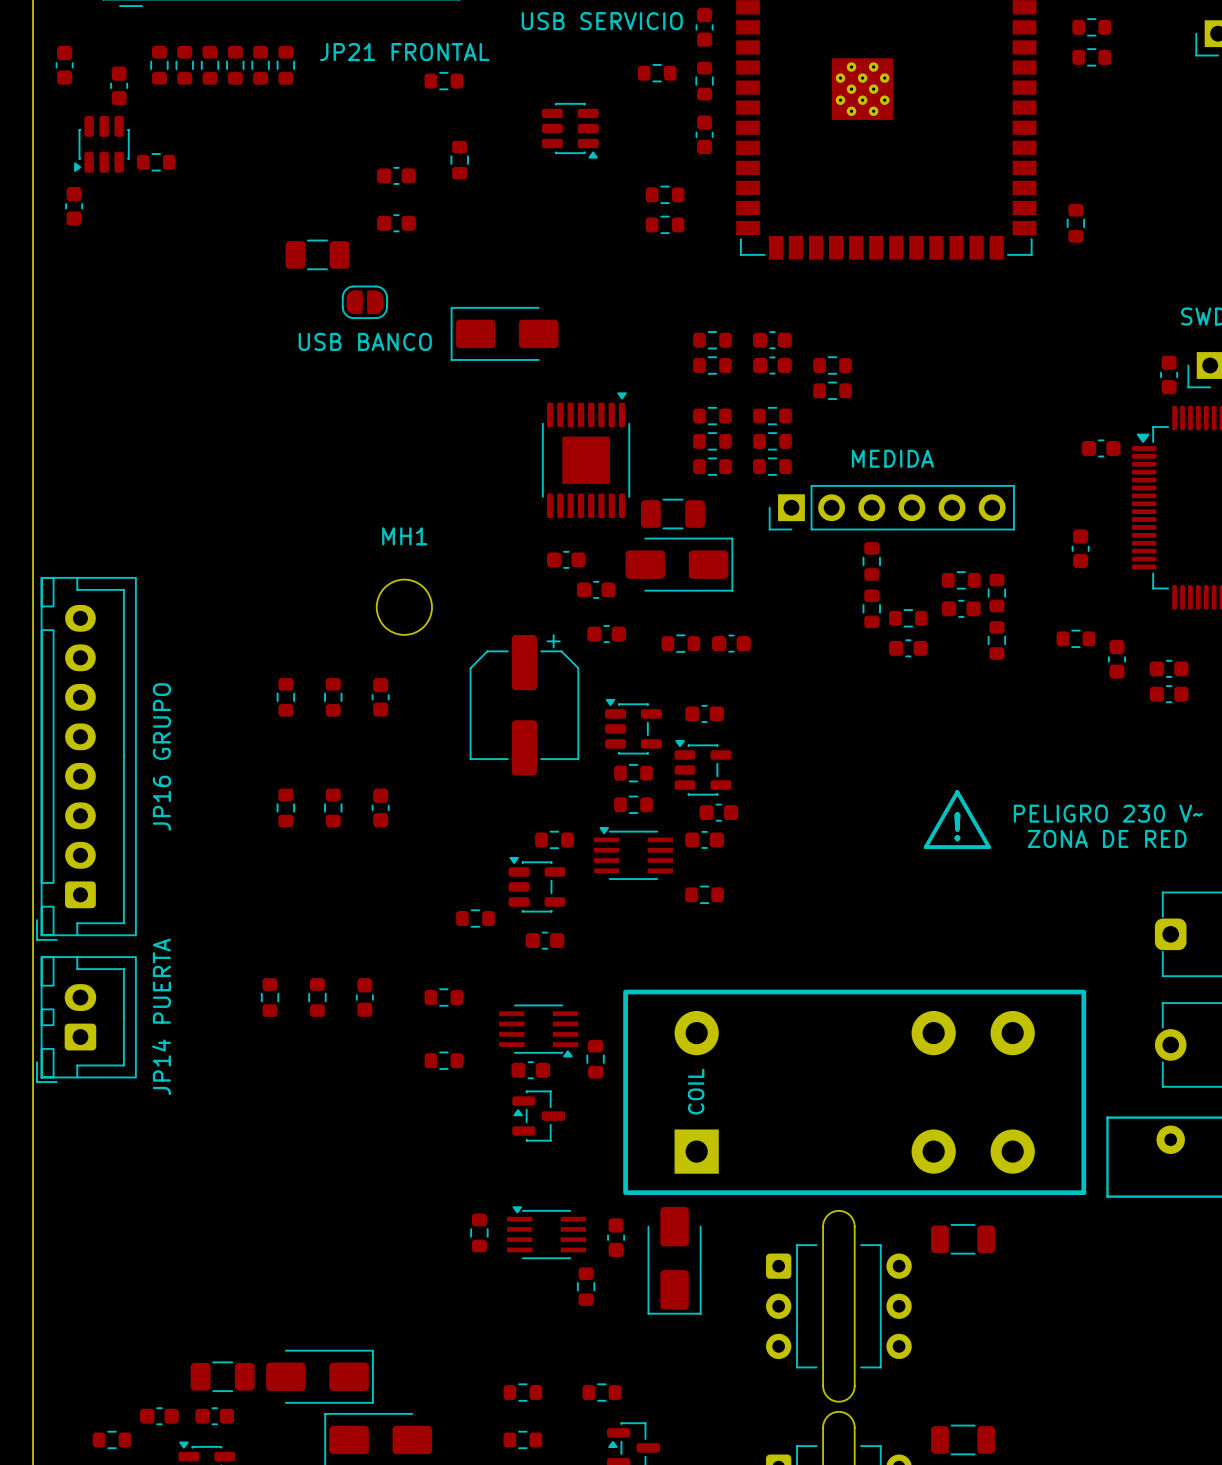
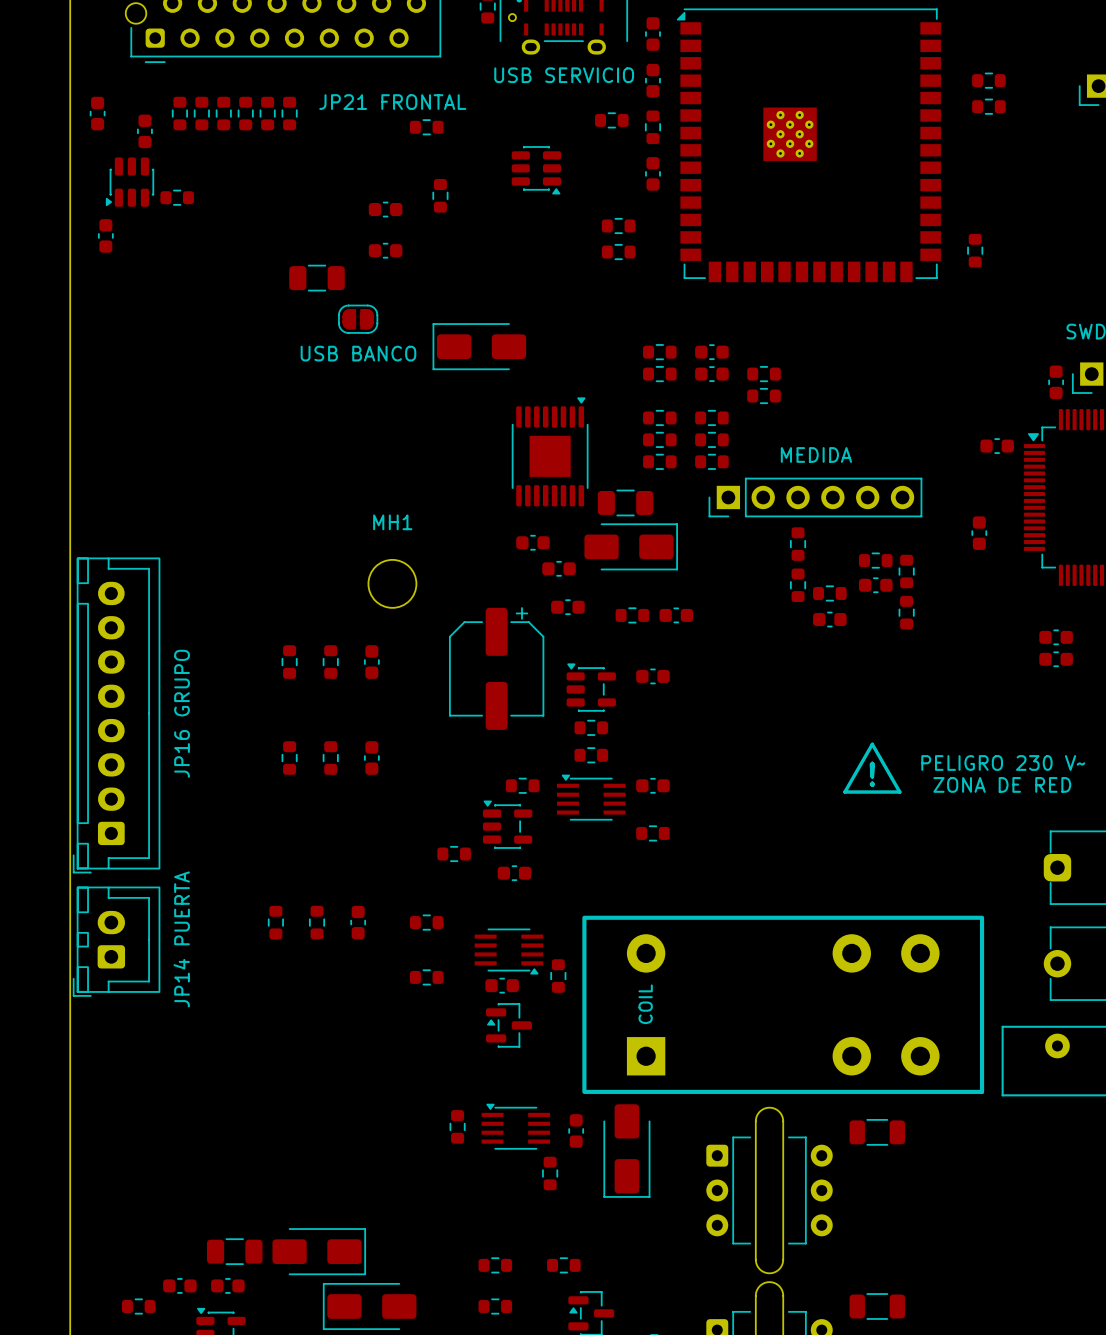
part: (1075, 638) -> none
part: (1116, 659) -> none
part: (702, 767) -> none
part: (718, 812) -> none

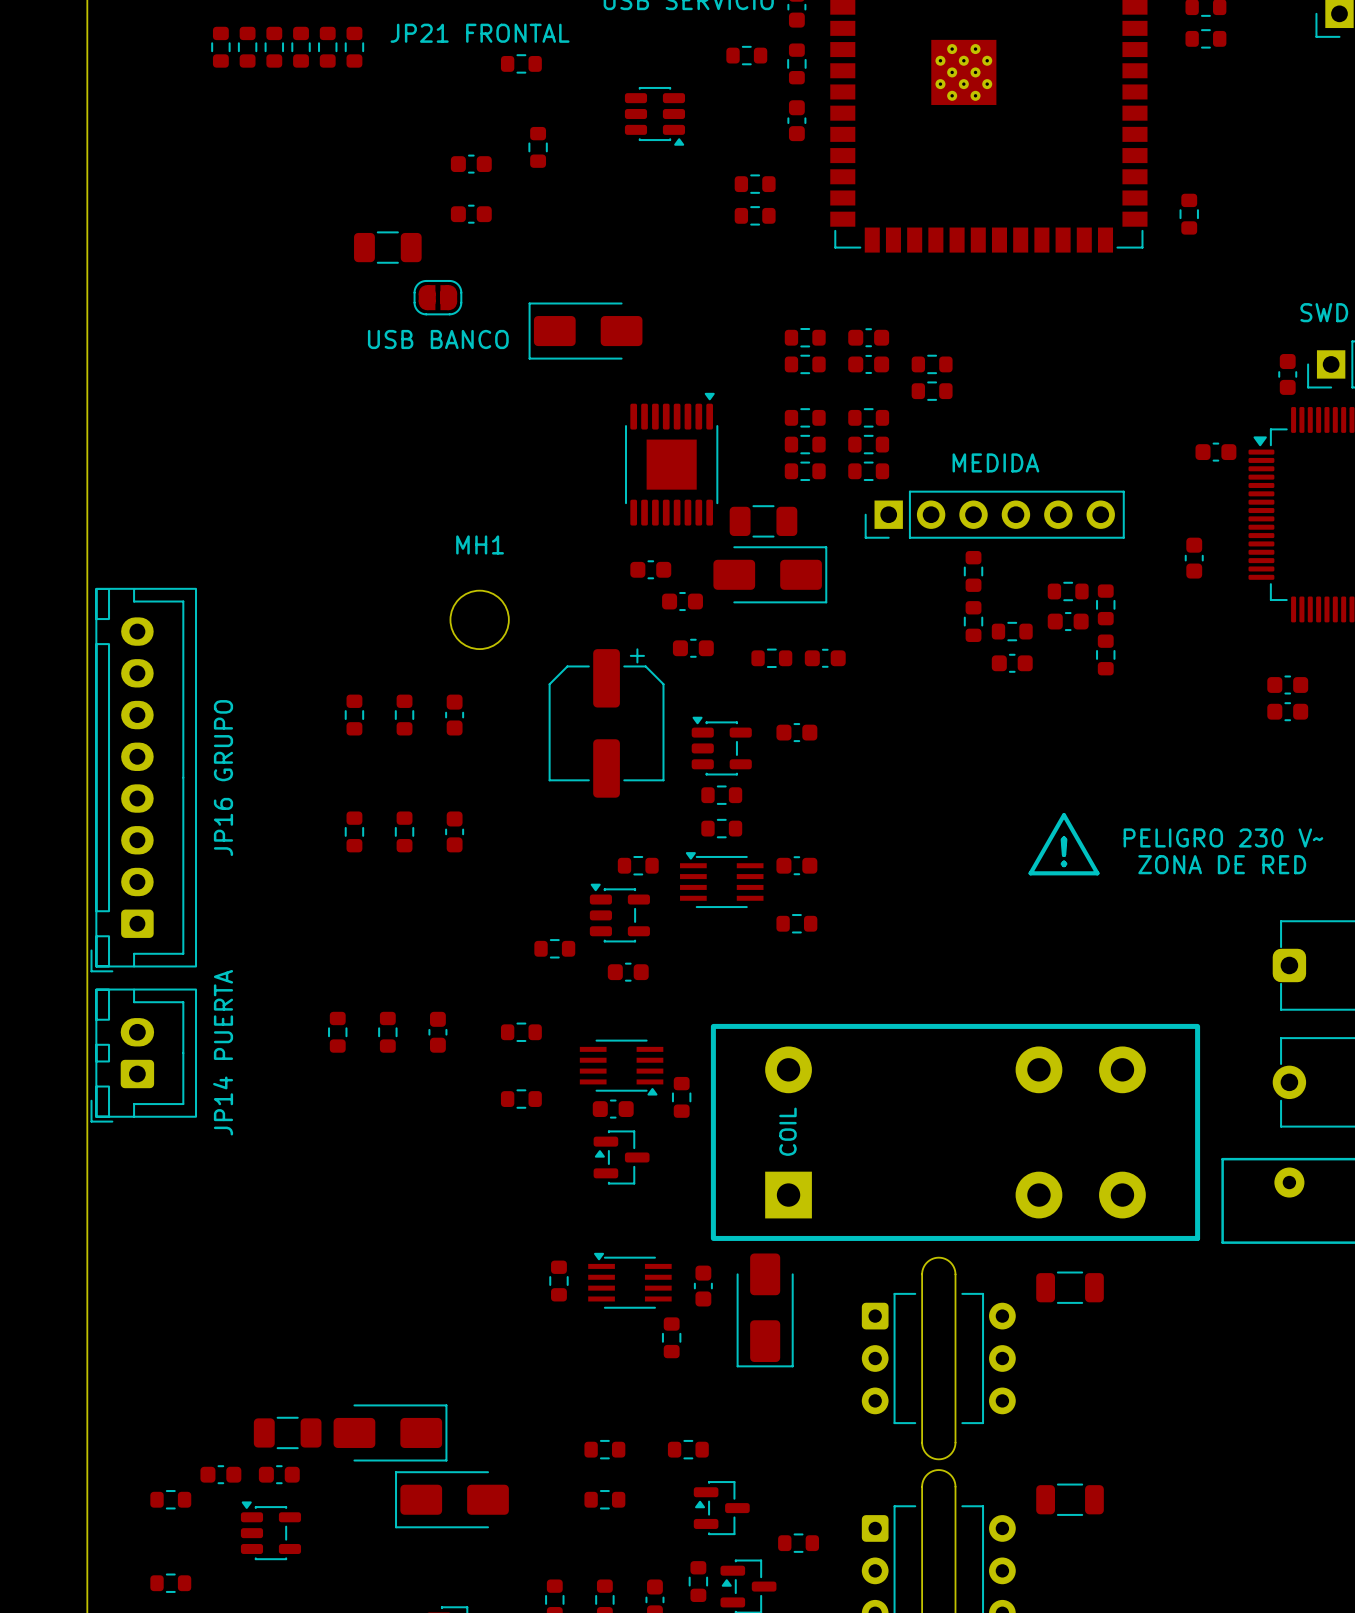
part: (97, 113) -> none
part: (144, 131) -> none
part: (129, 182) -> none
part: (177, 197) -> none
part: (105, 235) -> none

